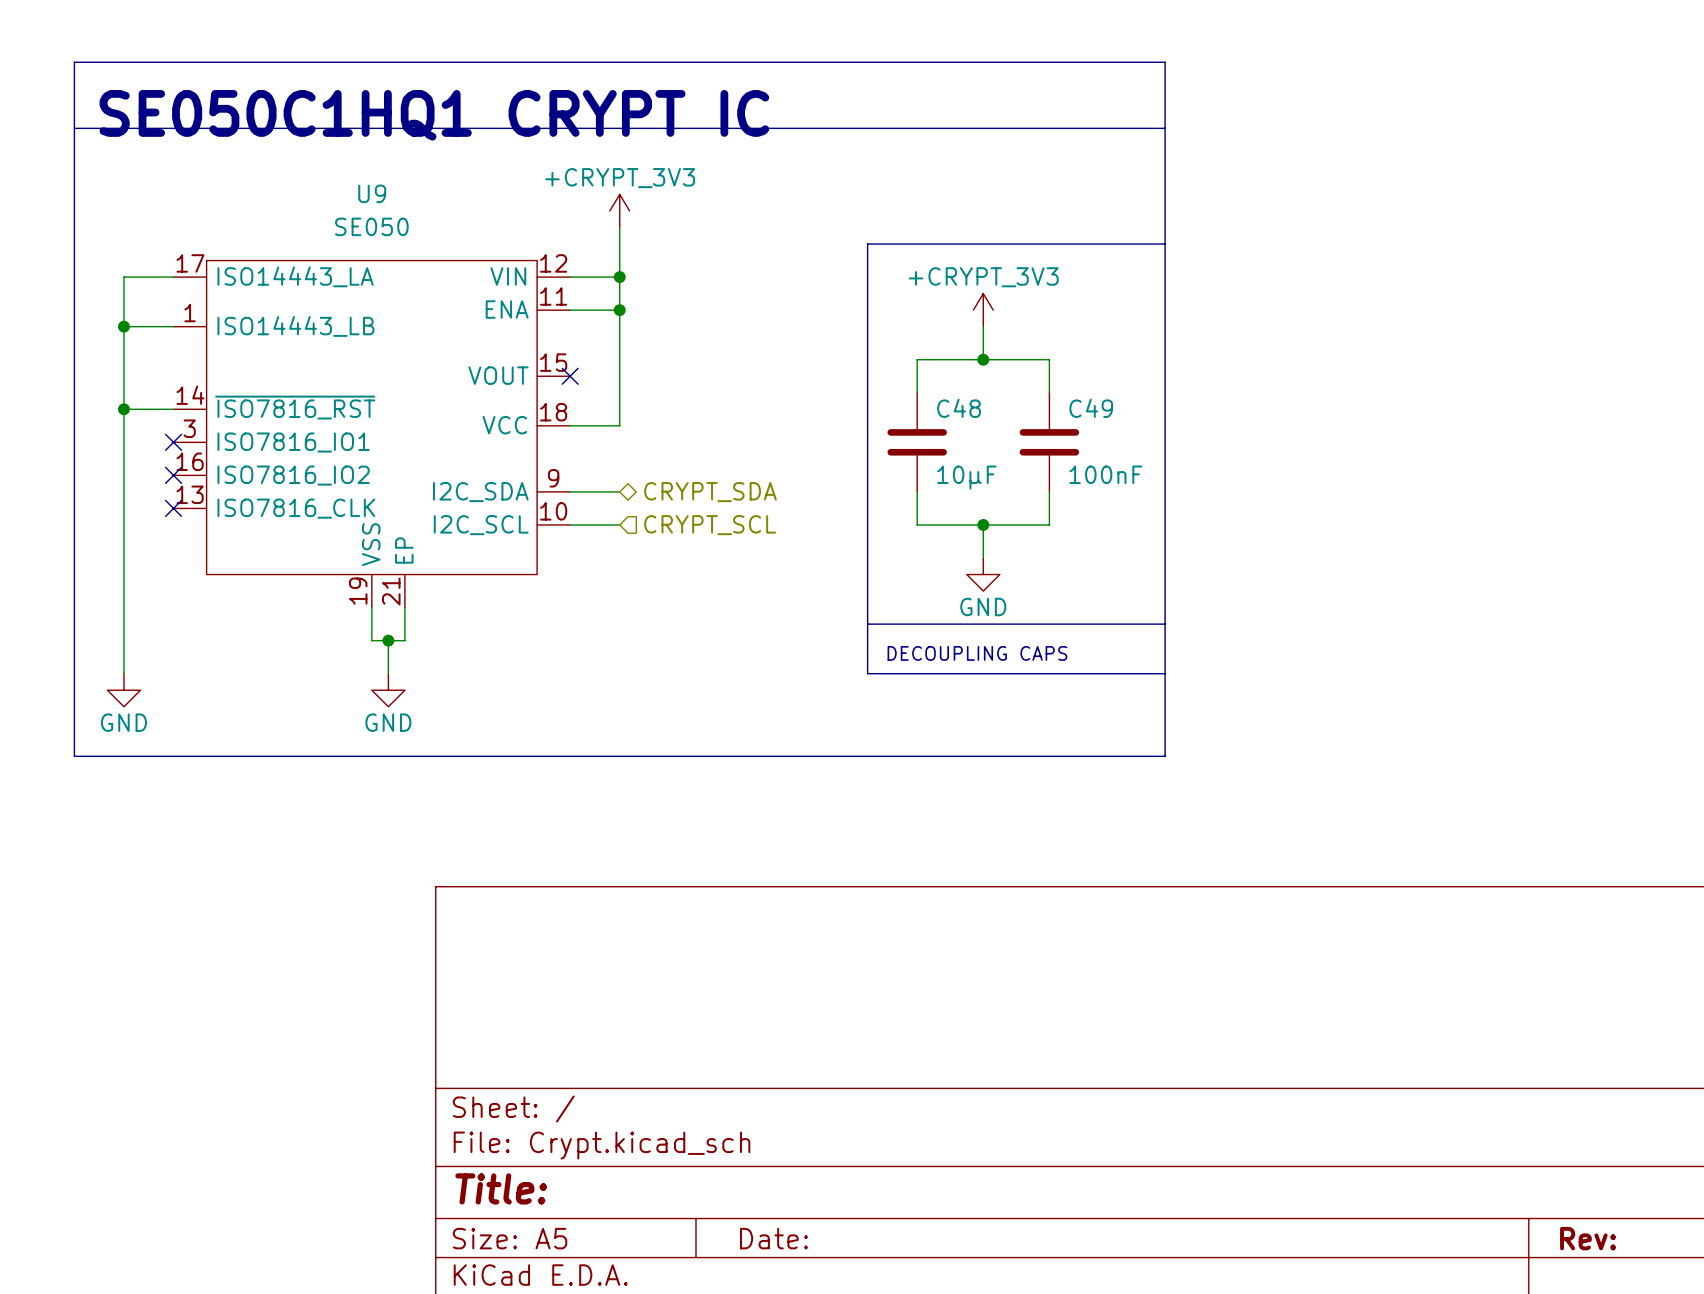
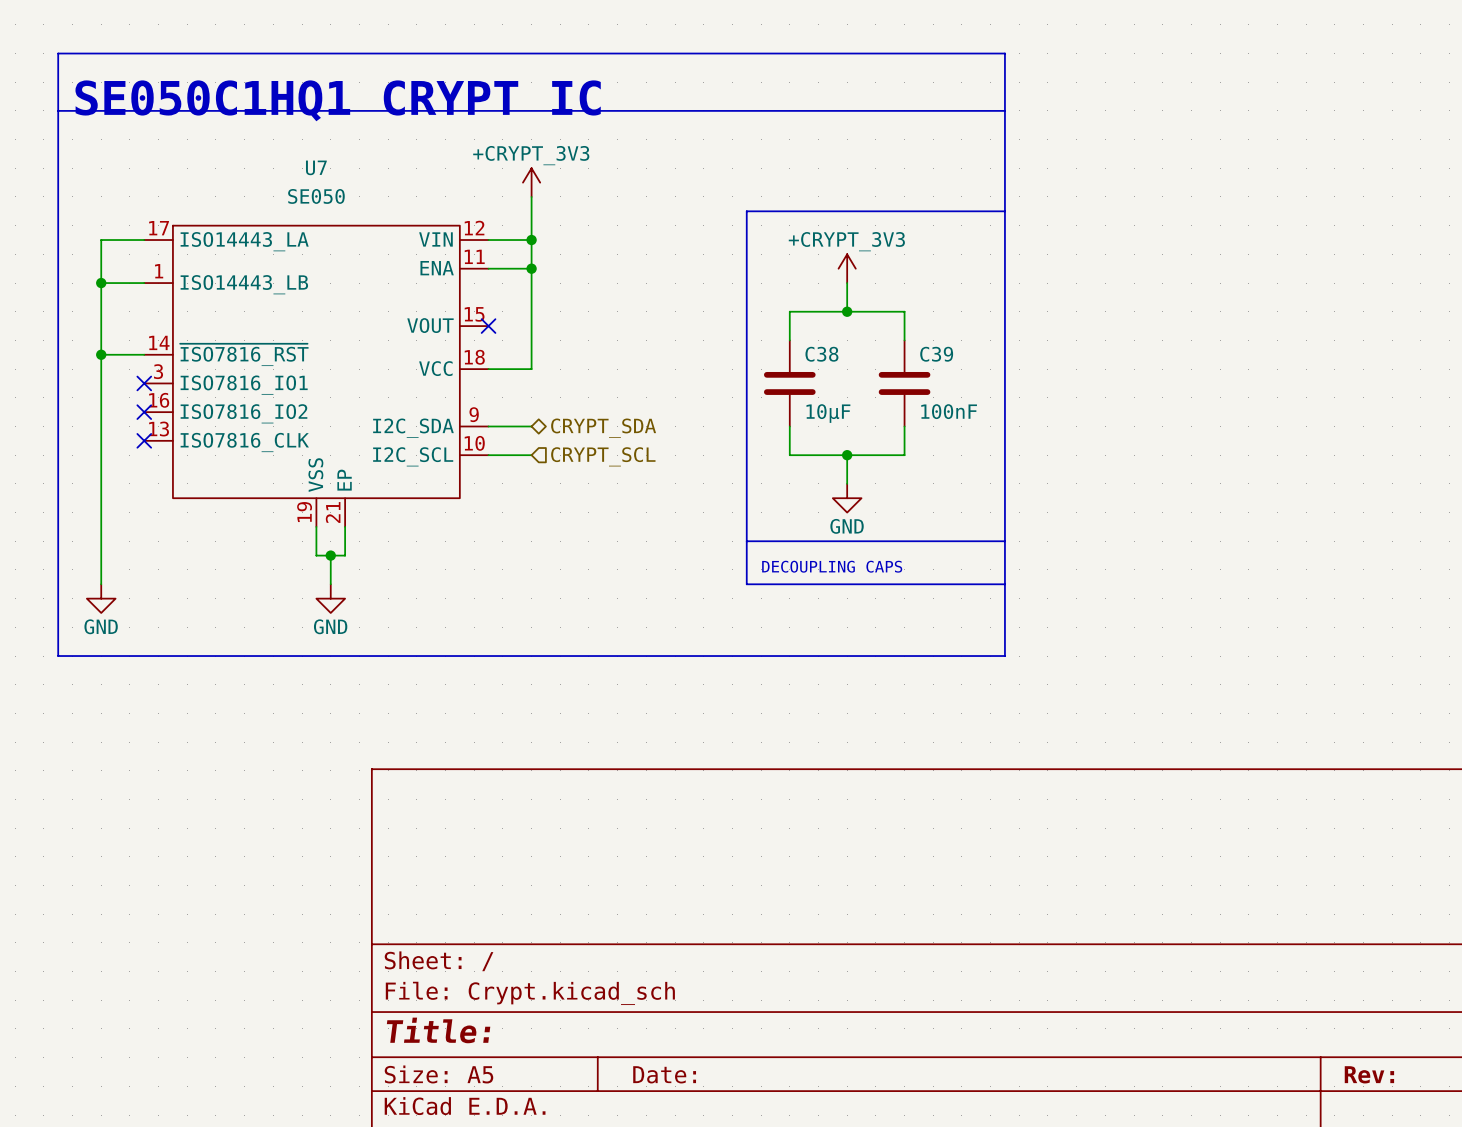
U9 name: U9 (372, 193) -> U7 (316, 167)
C48 name: C48 (959, 408) -> C38 (821, 354)
C49 name: C49 (1091, 408) -> C39 (936, 354)

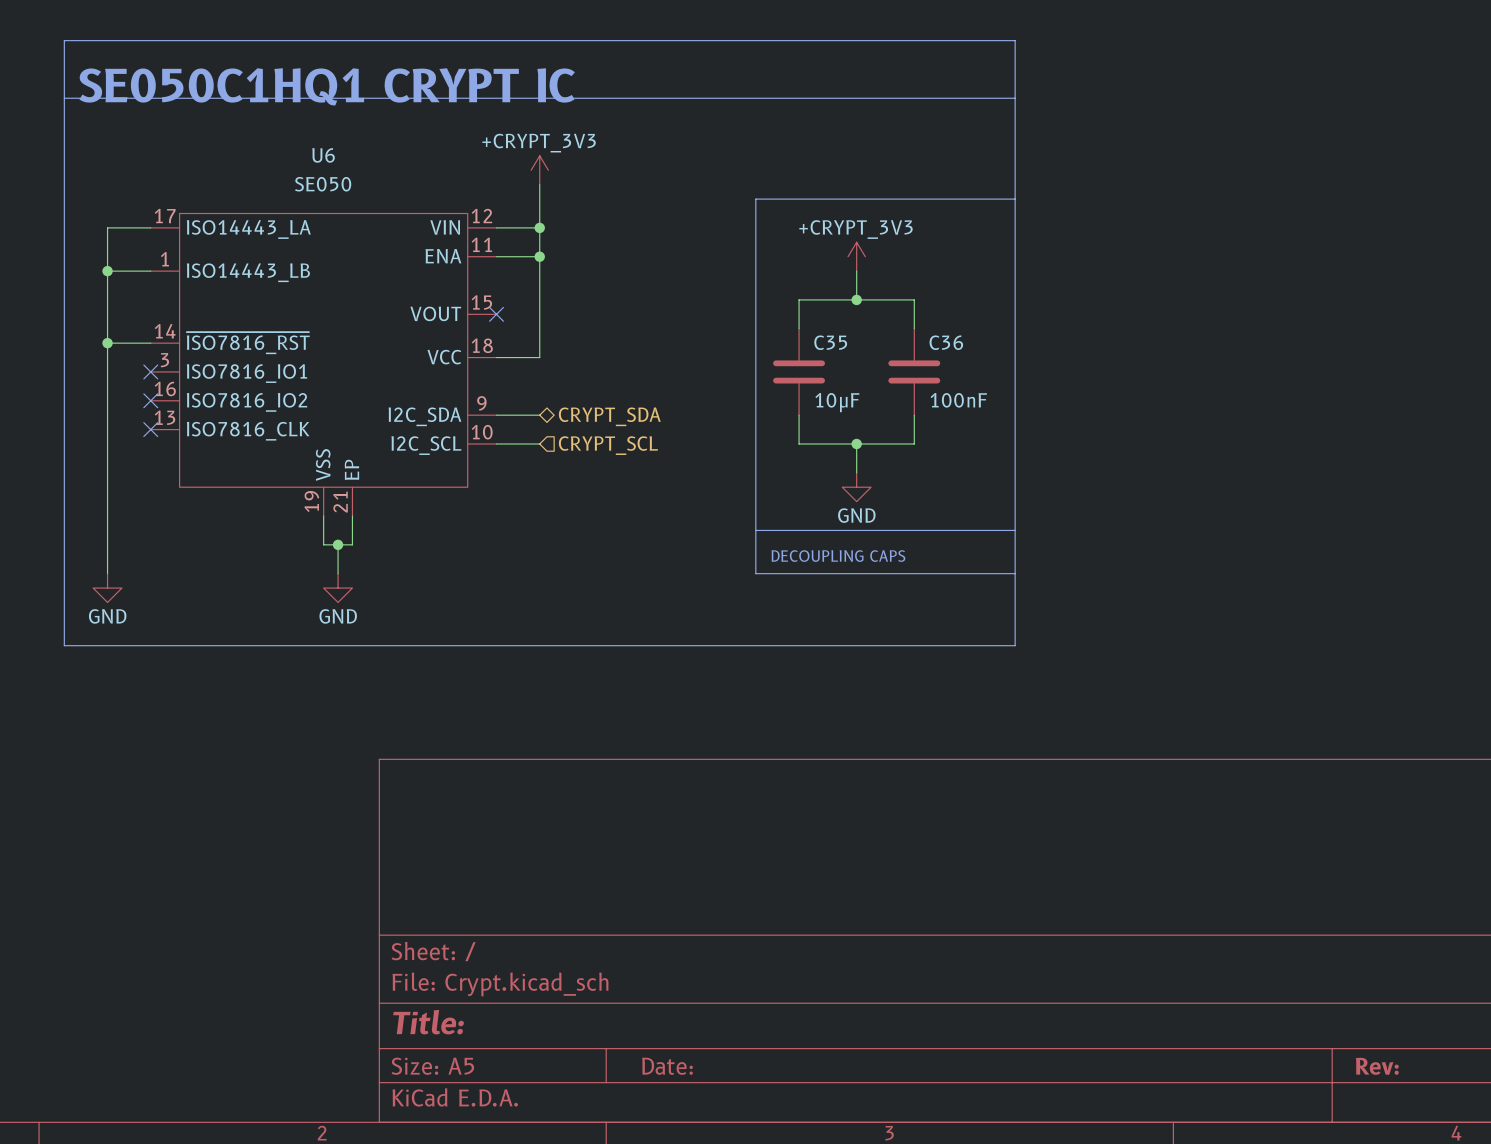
U7 name: U7 (316, 167) -> U6 (323, 155)
C38 name: C38 (821, 354) -> C35 (830, 342)
C39 name: C39 (936, 354) -> C36 (946, 342)

